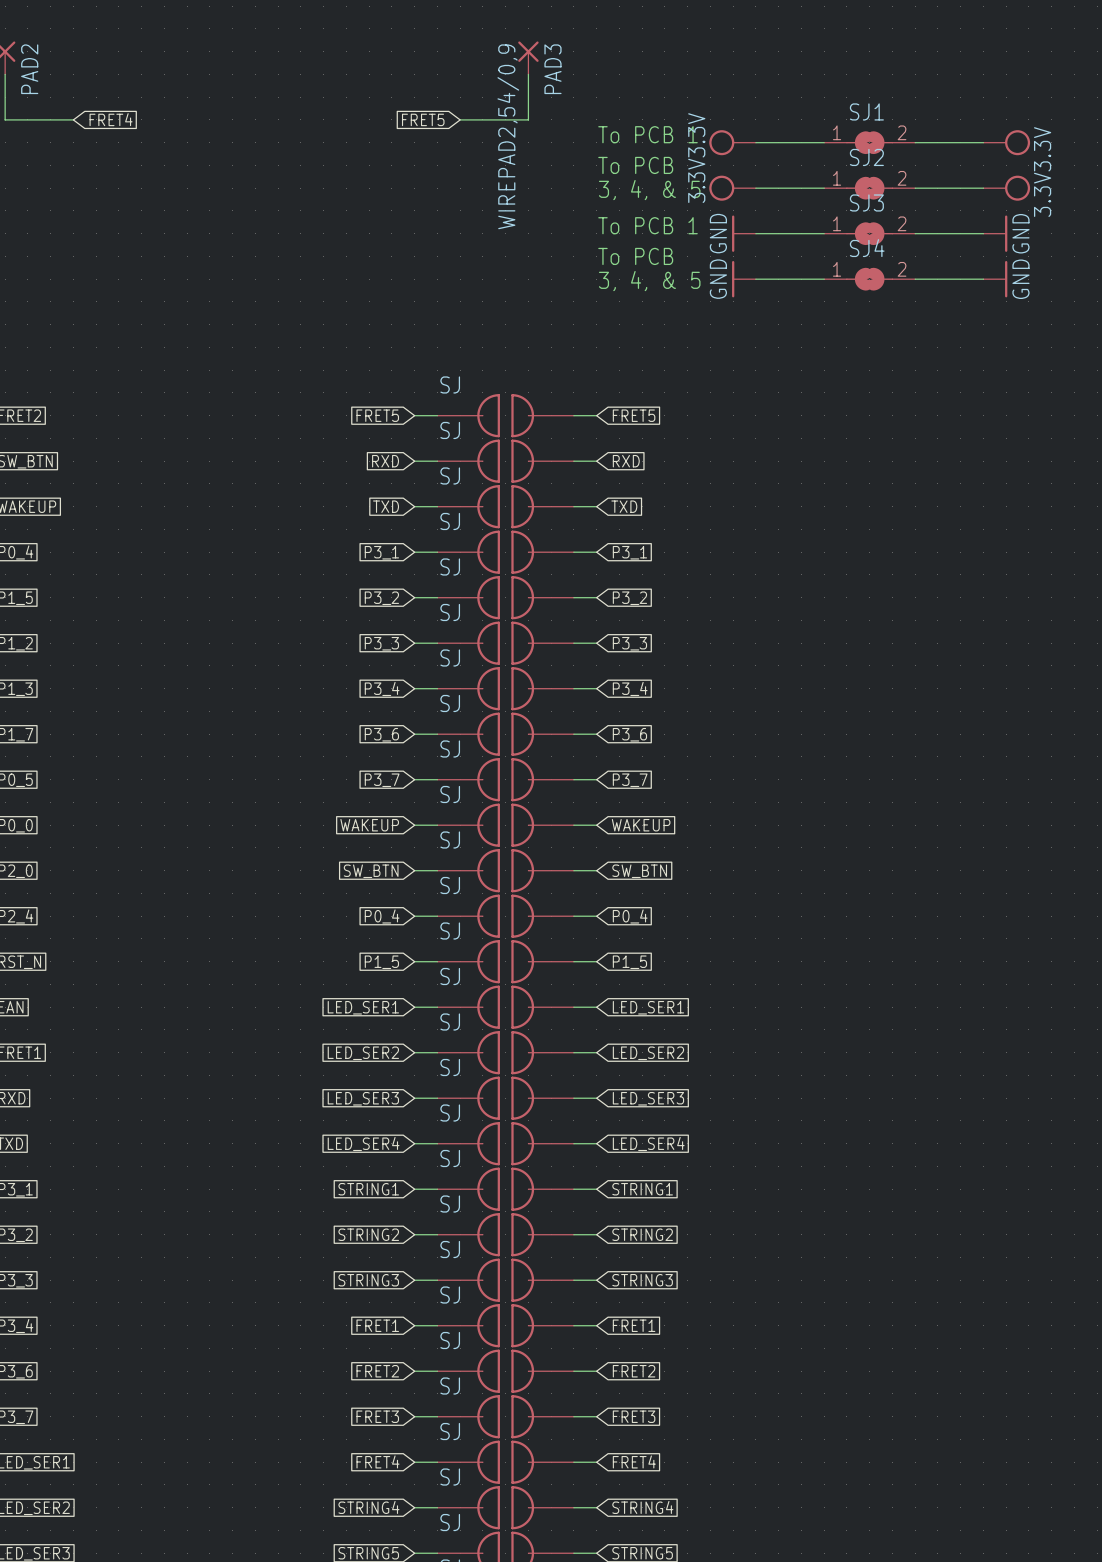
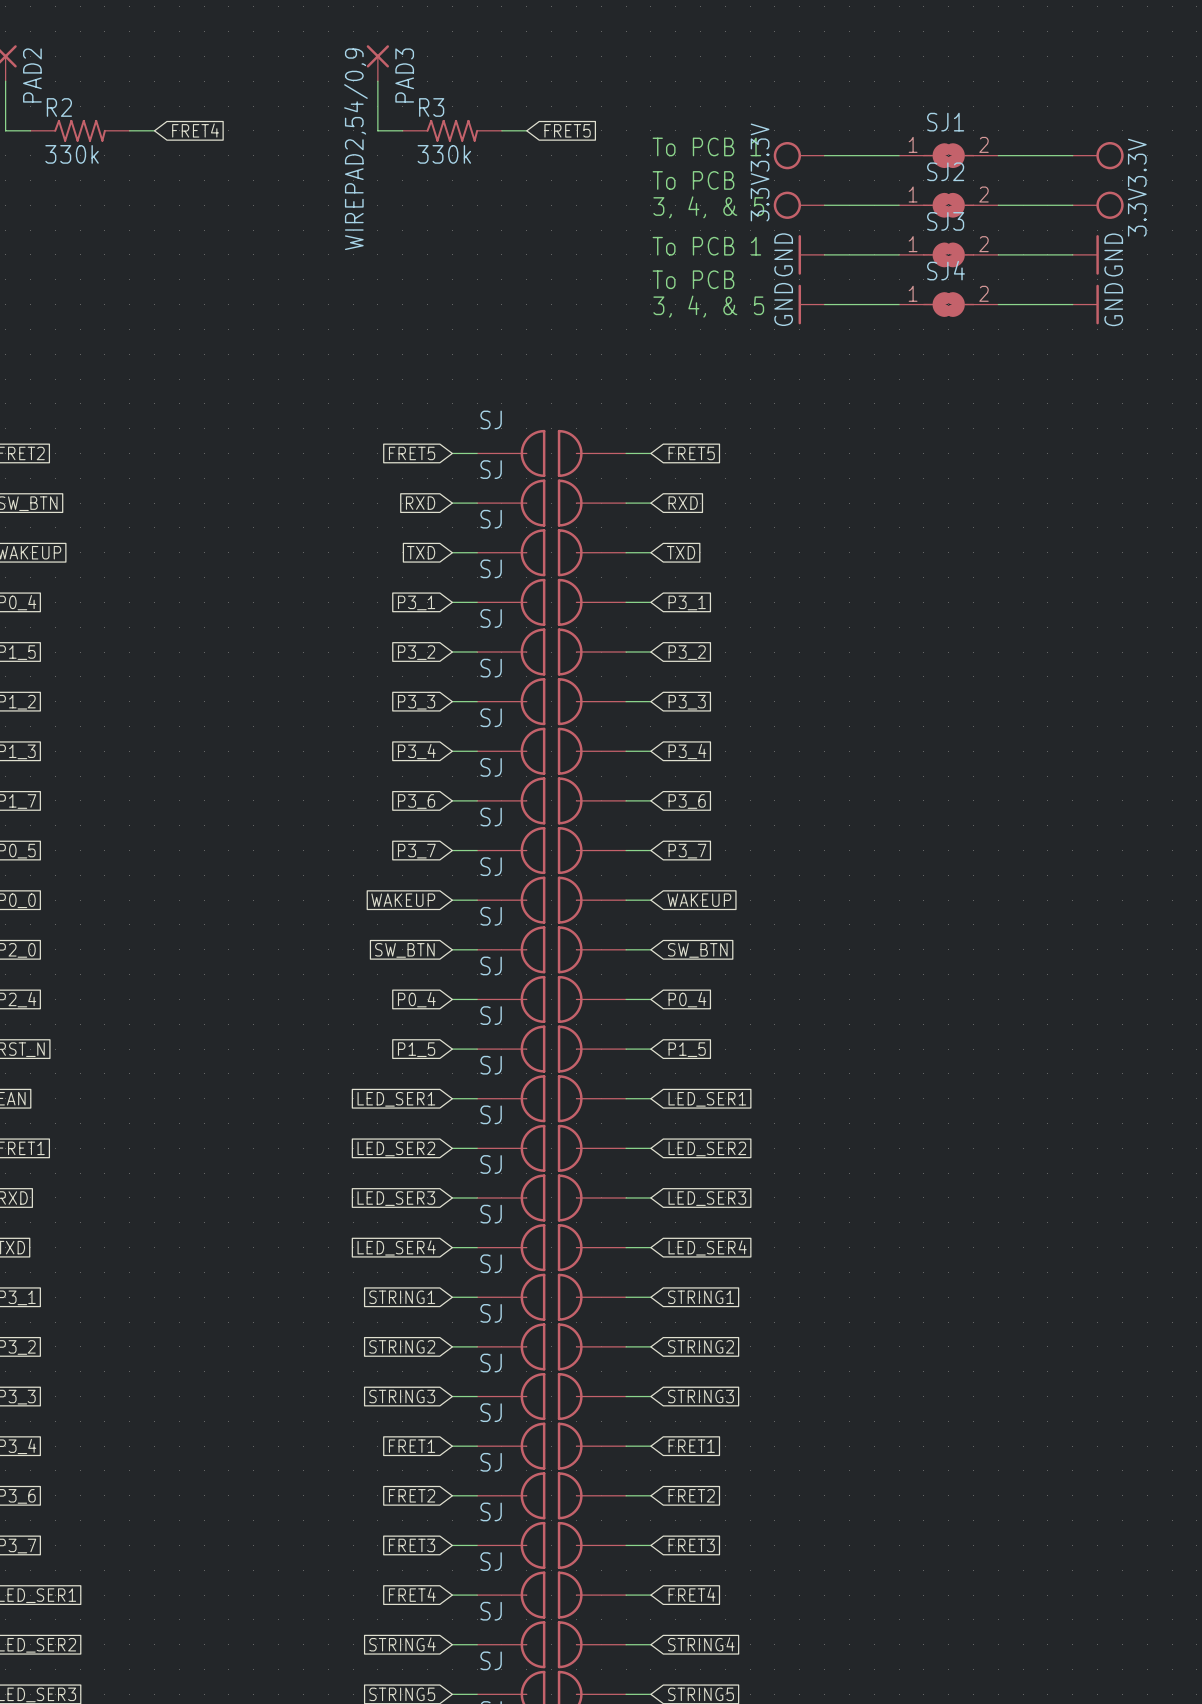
PAD3 position: (528, 57) -> (377, 63)
wire: none -> (377, 81) (377, 130) (402, 130)
wire: (528, 74) (528, 119) (482, 119) -> none
R2: none -> 330k (80, 130)
global label position: FRET4 (111, 119) -> FRET4 (195, 130)
wire: none -> (129, 130) (154, 130)
R3: none -> 330k (452, 130)
global label rotation: 0° (423, 119) -> 180° (567, 130)
global label position: FRET5 (423, 119) -> FRET5 (567, 130)

